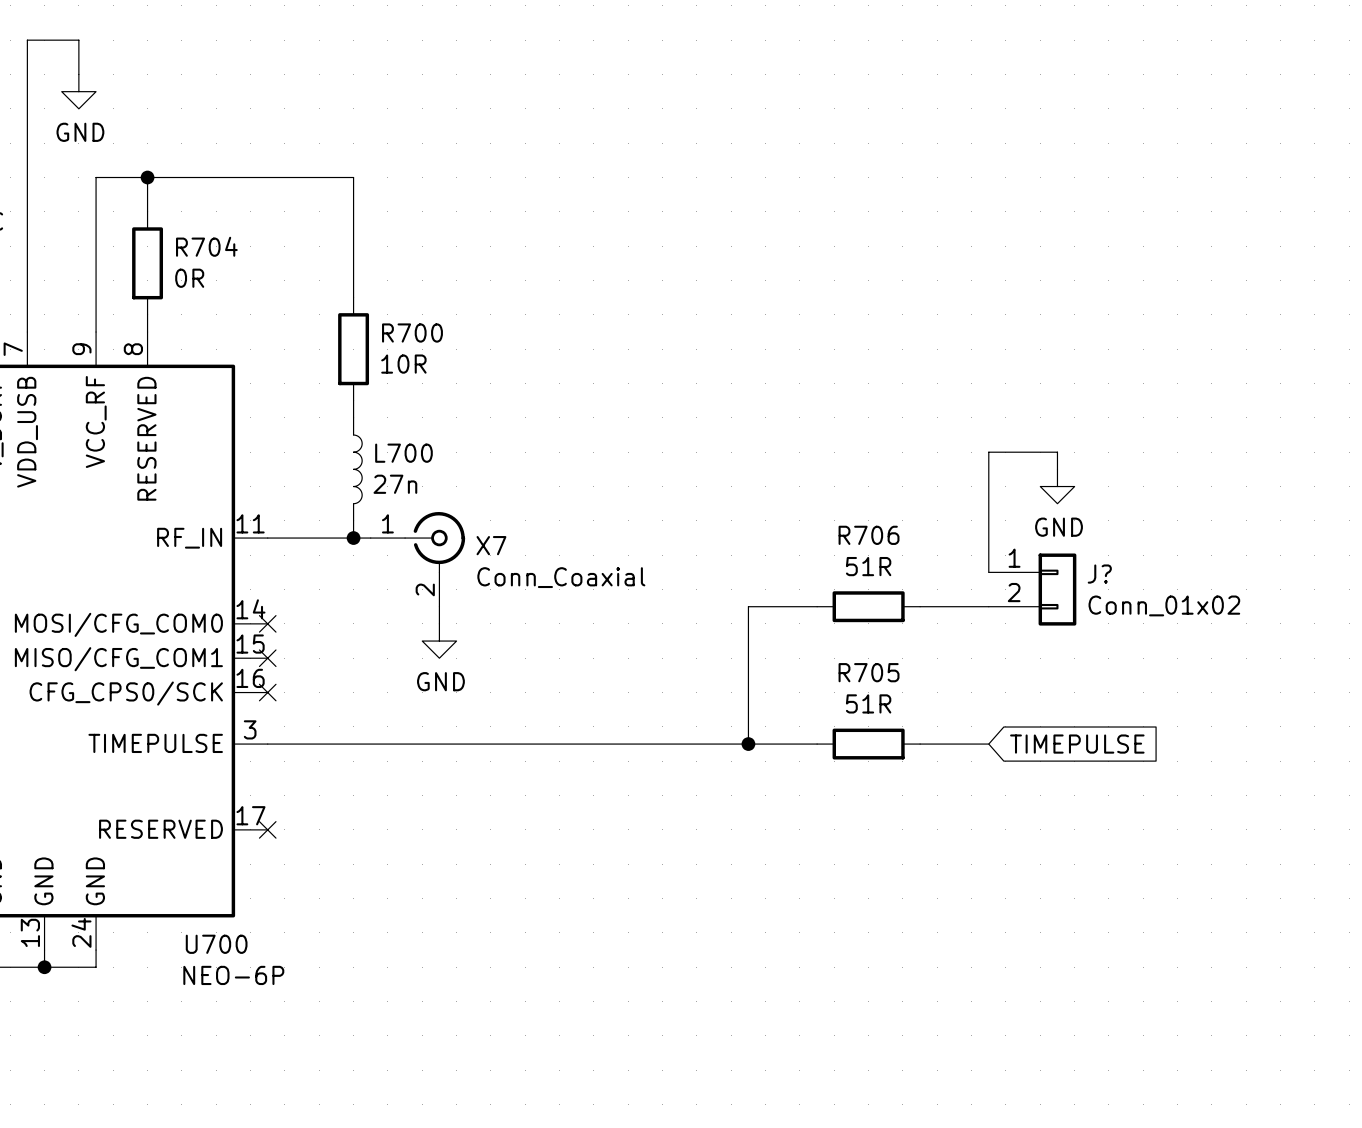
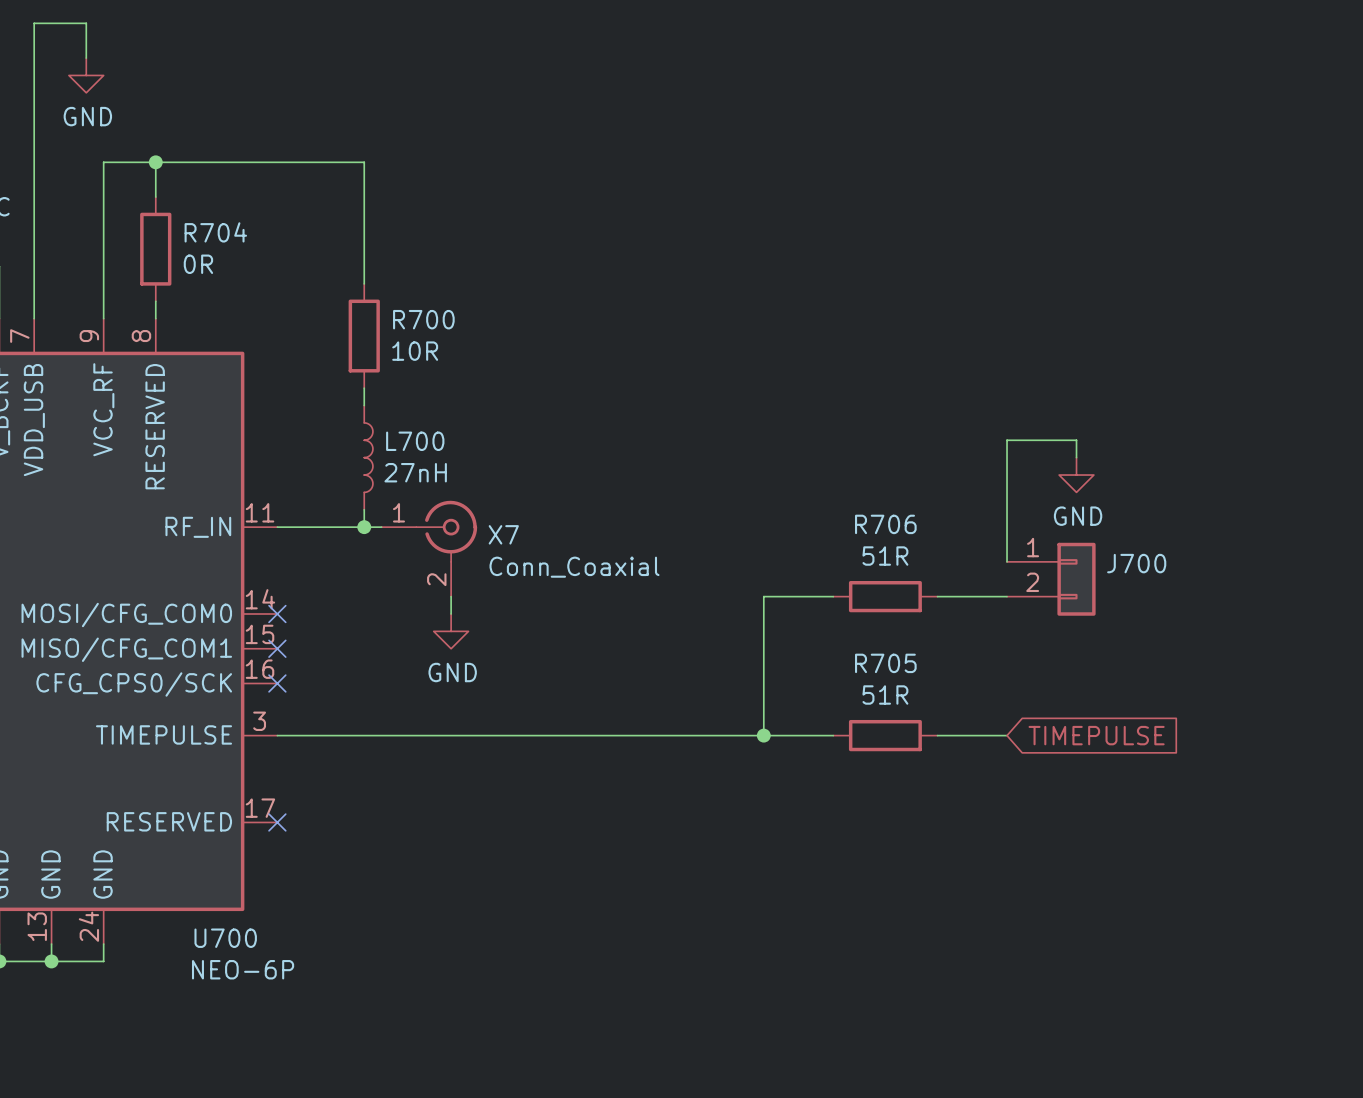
L700 value: 27n (395, 484) -> 27nH (415, 472)
J? name: J? (1099, 574) -> J700 (1136, 563)
J? value: Conn_01x02 (1164, 605) -> none

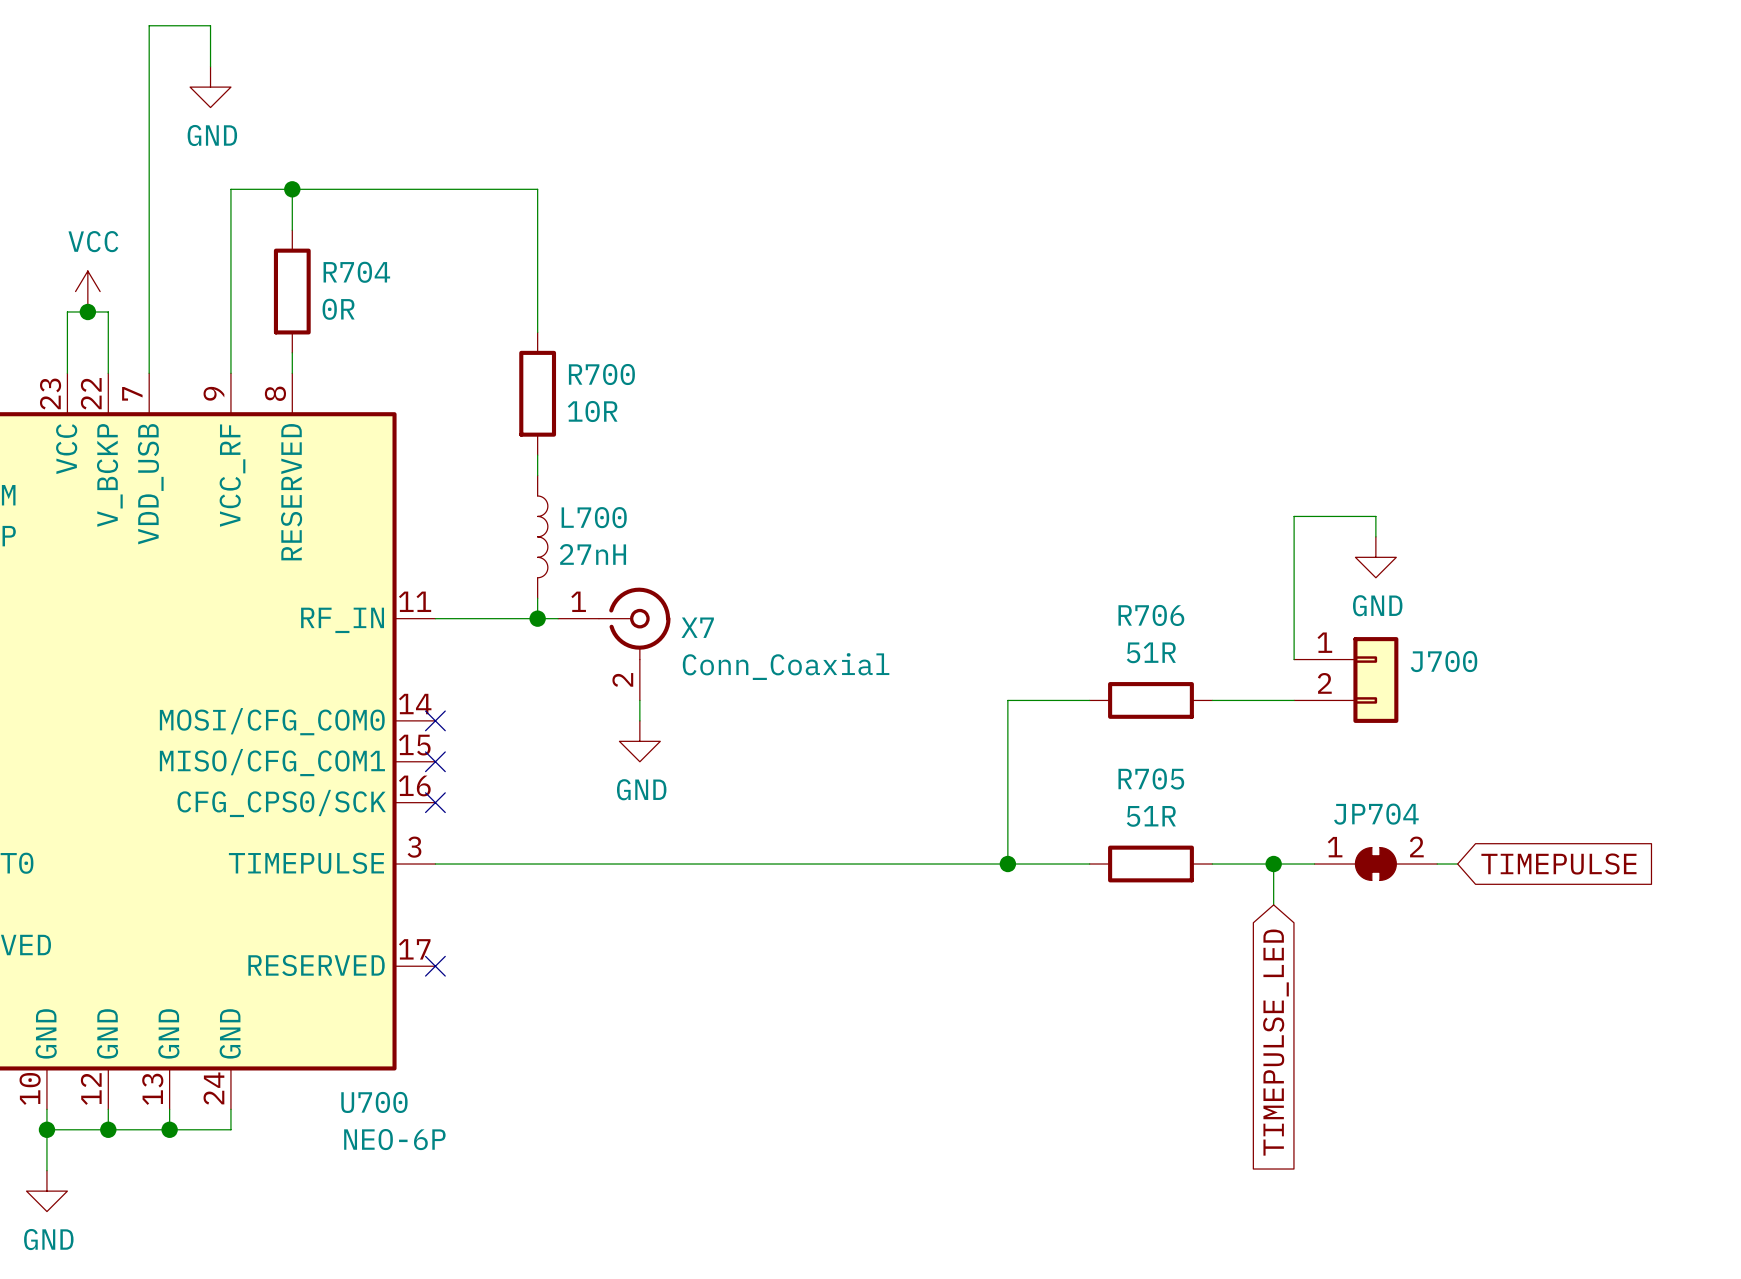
wire: none -> (1273, 864) (1273, 904)
junction: none -> (1273, 864)
wire: none -> (1294, 864) (1314, 864)
JP704: none -> (1375, 864)
global label position: TIMEPULSE (1096, 735) -> TIMEPULSE (1558, 864)
wire: none -> (1437, 864) (1457, 864)
global label: none -> TIMEPULSE_LED (1275, 1042)

